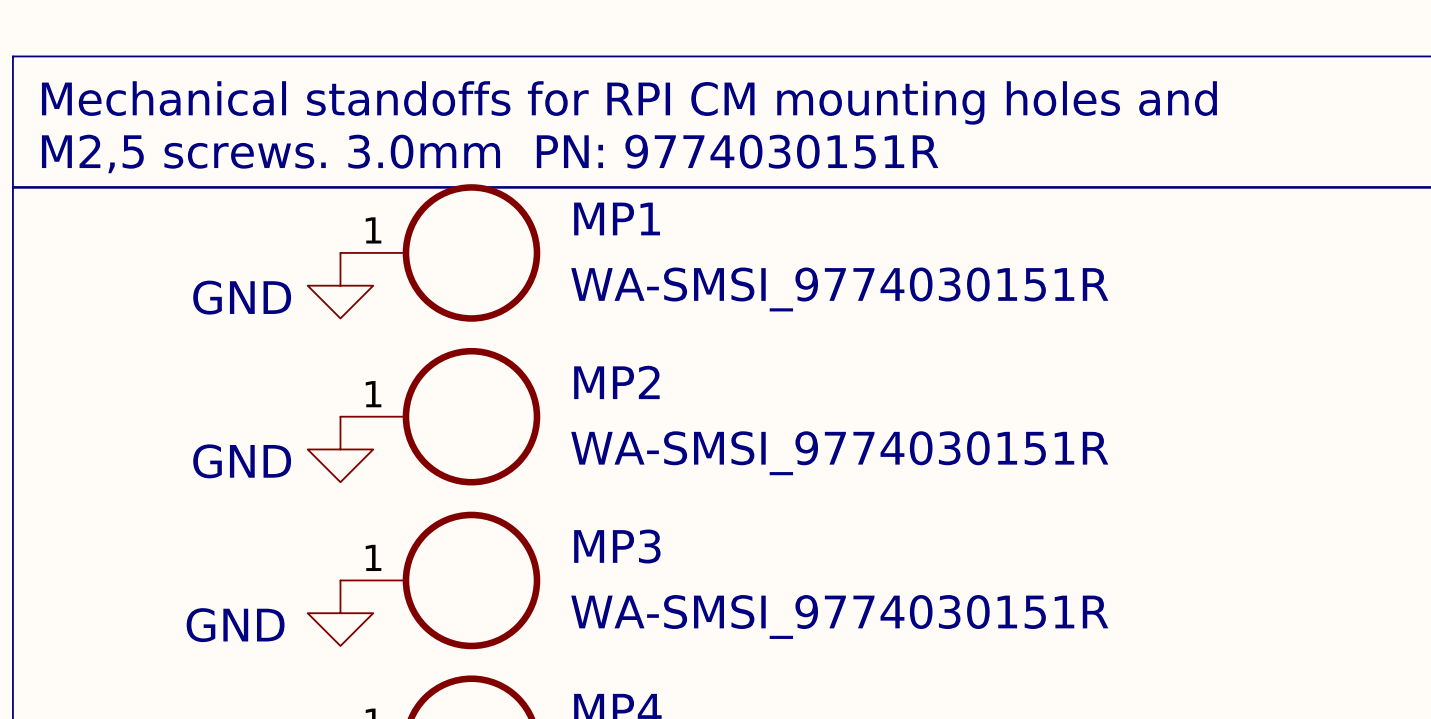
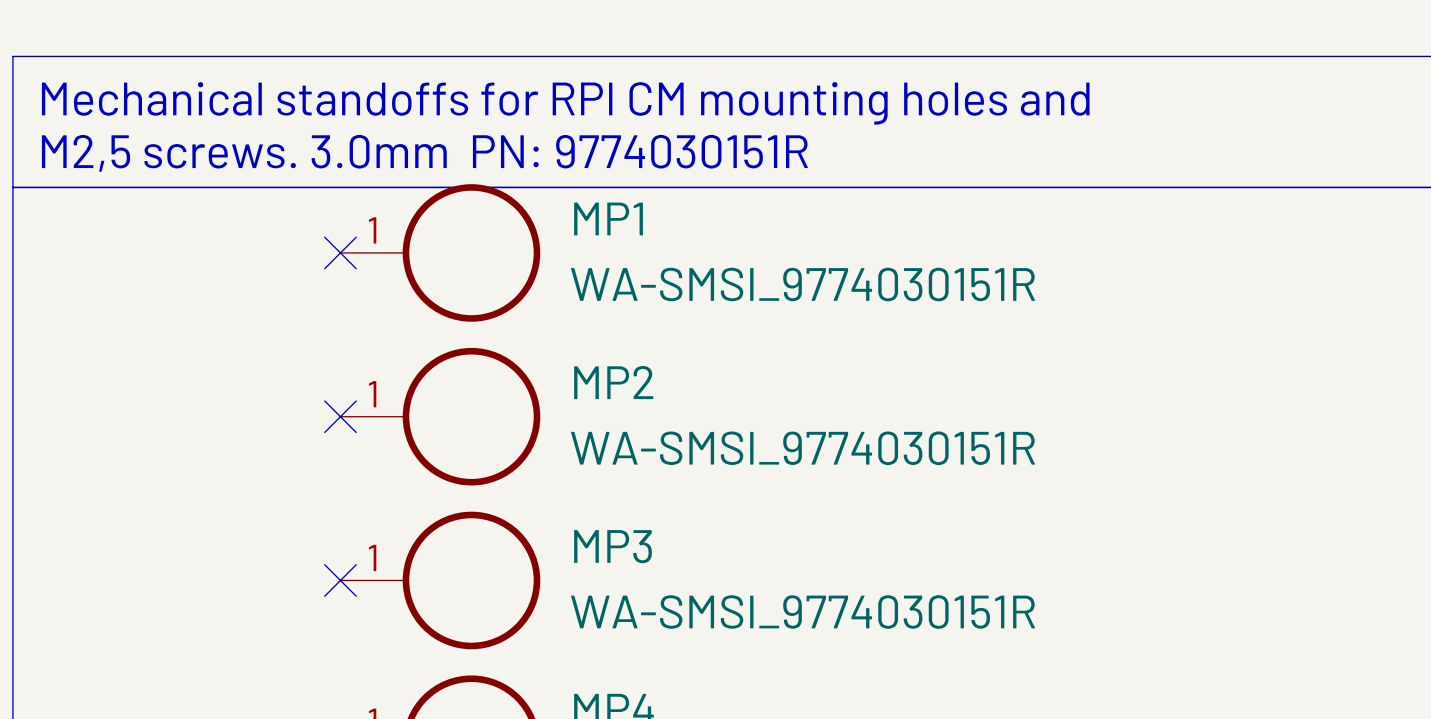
no-connect mark: none -> (340, 252)
power symbol: GND (340, 285) -> none
no-connect mark: none -> (340, 416)
power symbol: GND (340, 449) -> none
no-connect mark: none -> (340, 580)
power symbol: GND (340, 613) -> none

